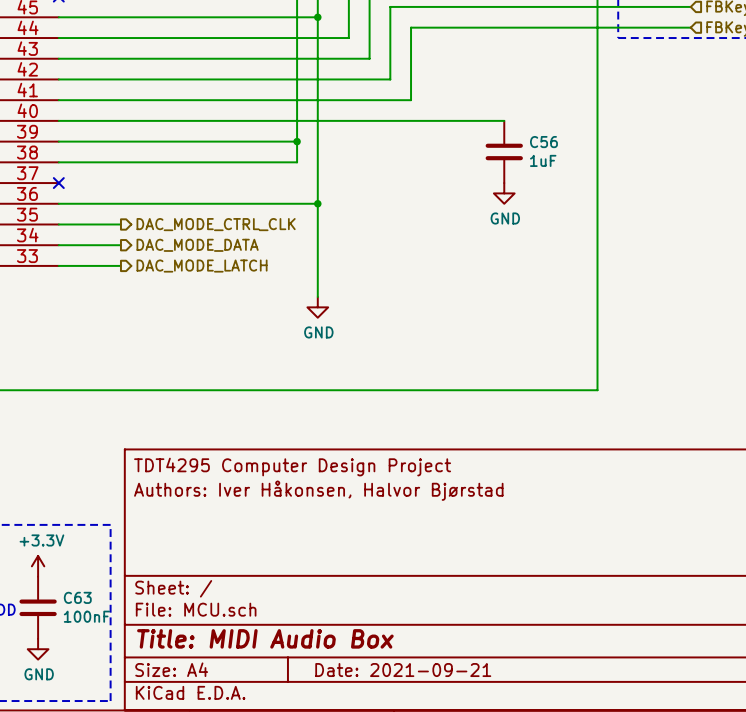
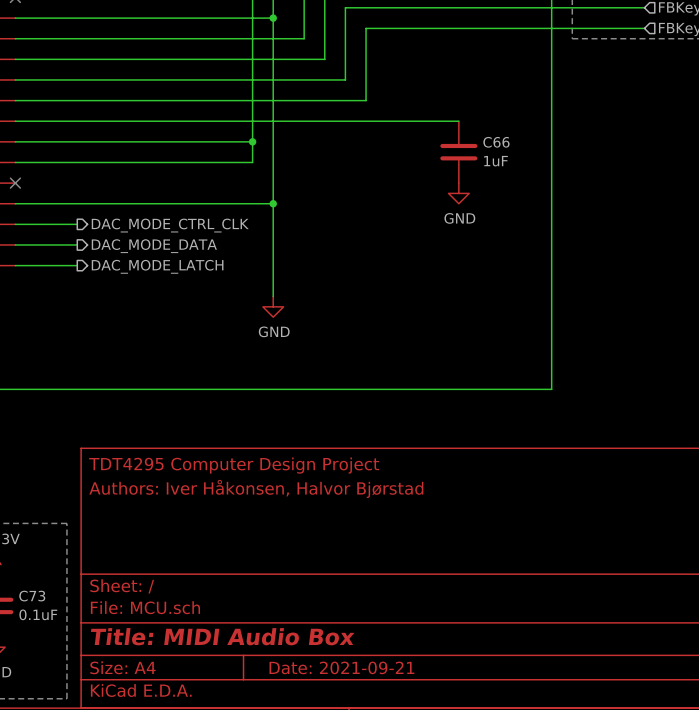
C56 name: C56 (543, 142) -> C66 (496, 142)
C63 name: C63 (77, 597) -> C73 (32, 596)
C63 value: 100nF (86, 616) -> 0.1uF (38, 614)

